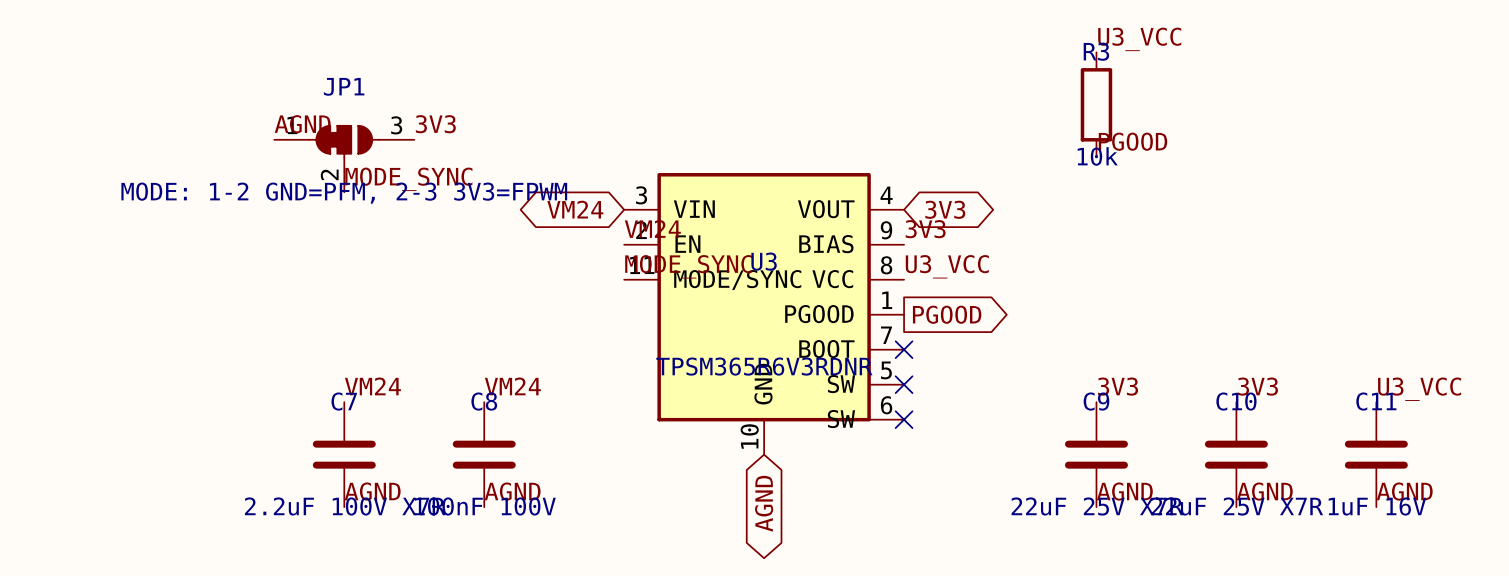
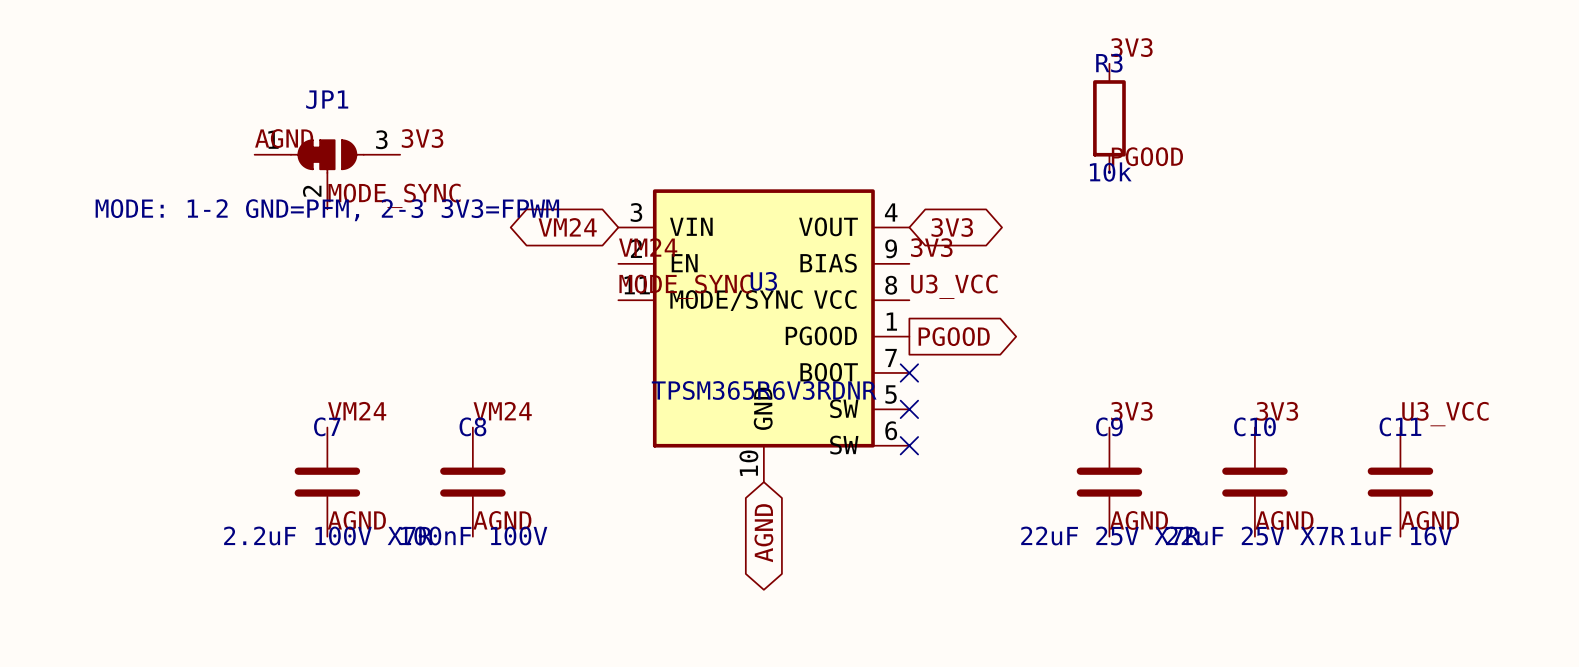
label: U3_VCC (1139, 39) -> 3V3 (1131, 47)

